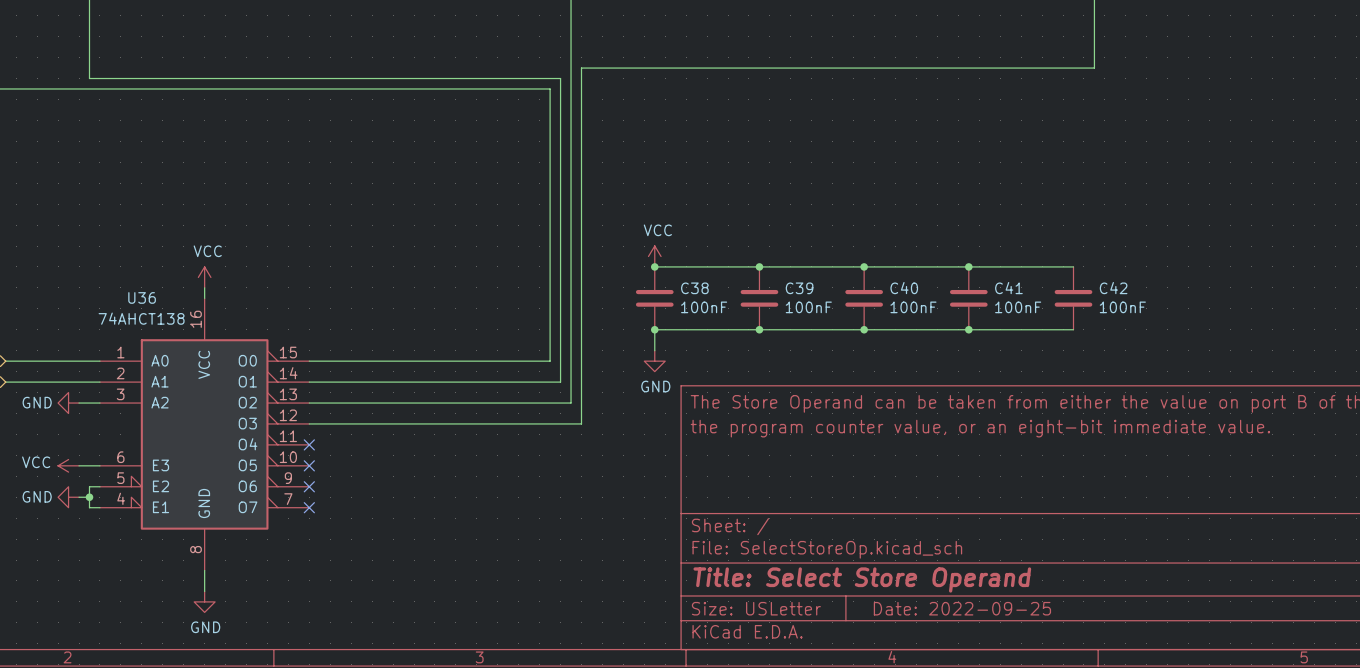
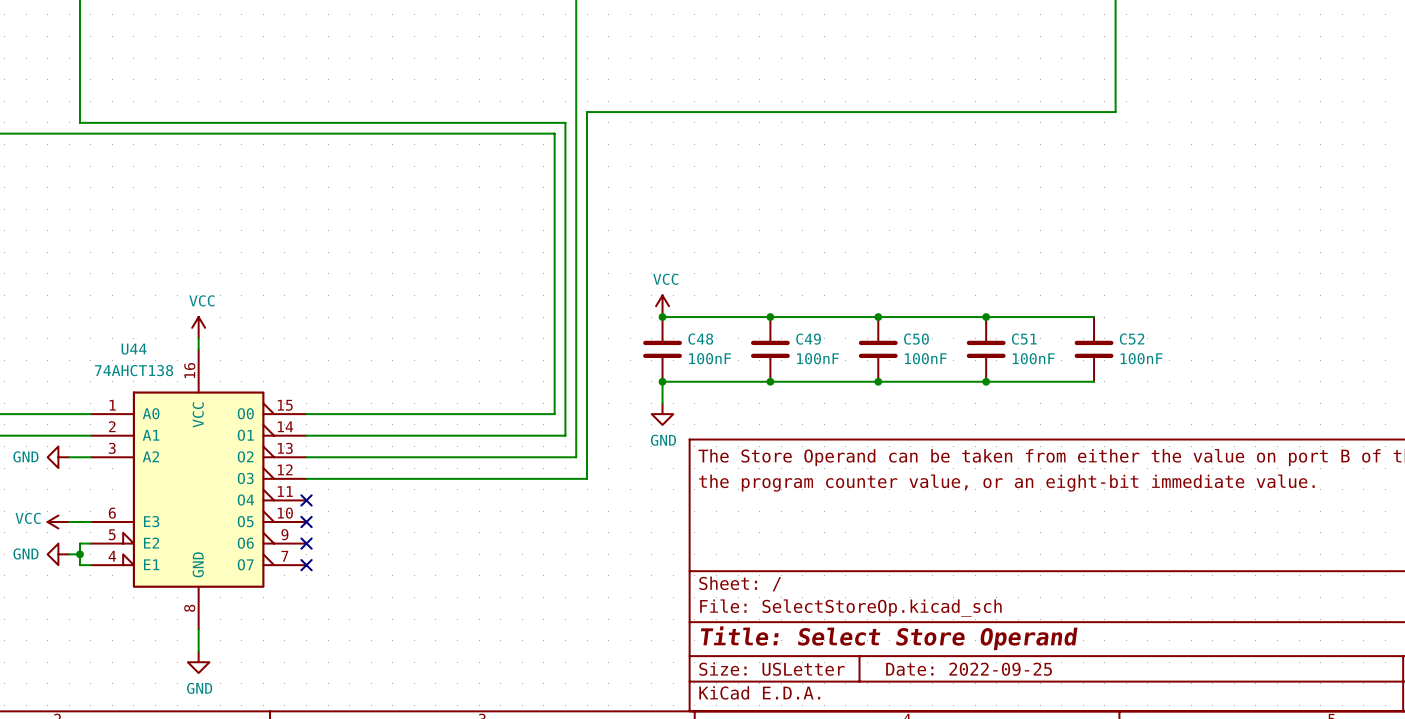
C38 name: C38 (694, 288) -> C48 (700, 339)
C39 name: C39 (799, 288) -> C49 (808, 339)
C40 name: C40 (904, 288) -> C50 (916, 339)
C41 name: C41 (1008, 288) -> C51 (1024, 339)
C42 name: C42 (1113, 288) -> C52 (1132, 339)
U36 name: U36 (142, 297) -> U44 (134, 349)

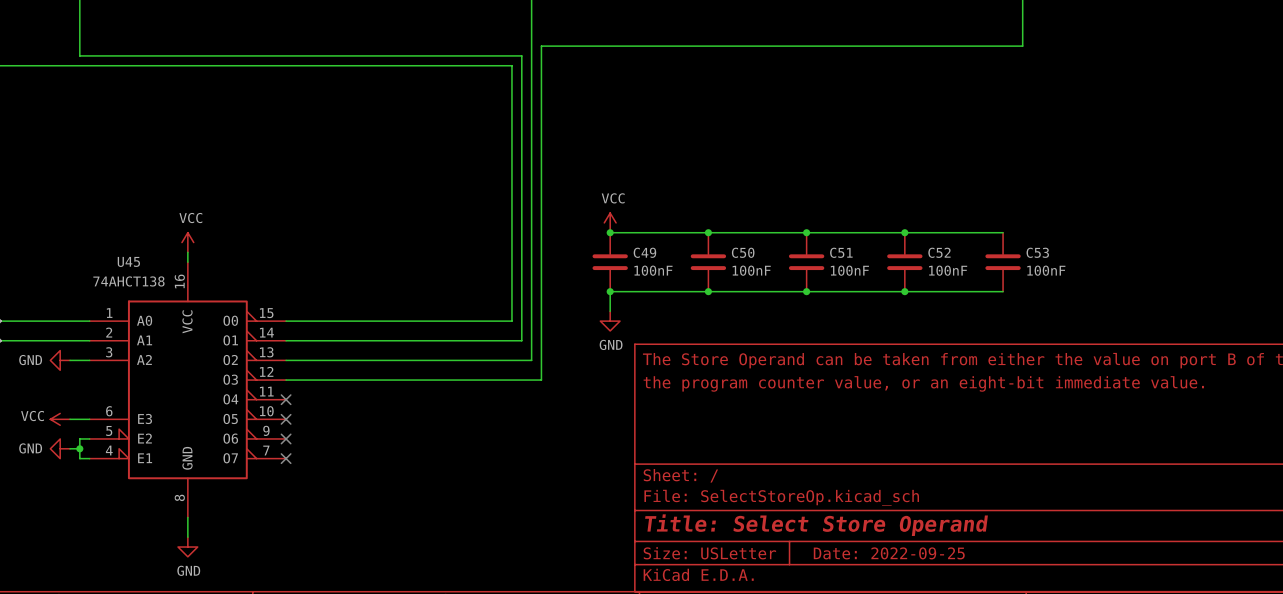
C48 name: C48 (700, 339) -> C49 (644, 252)
C49 name: C49 (808, 339) -> C50 (743, 252)
C50 name: C50 (916, 339) -> C51 (841, 252)
C51 name: C51 (1024, 339) -> C52 (939, 252)
C52 name: C52 (1132, 339) -> C53 (1037, 252)
U44 name: U44 (134, 349) -> U45 (128, 261)

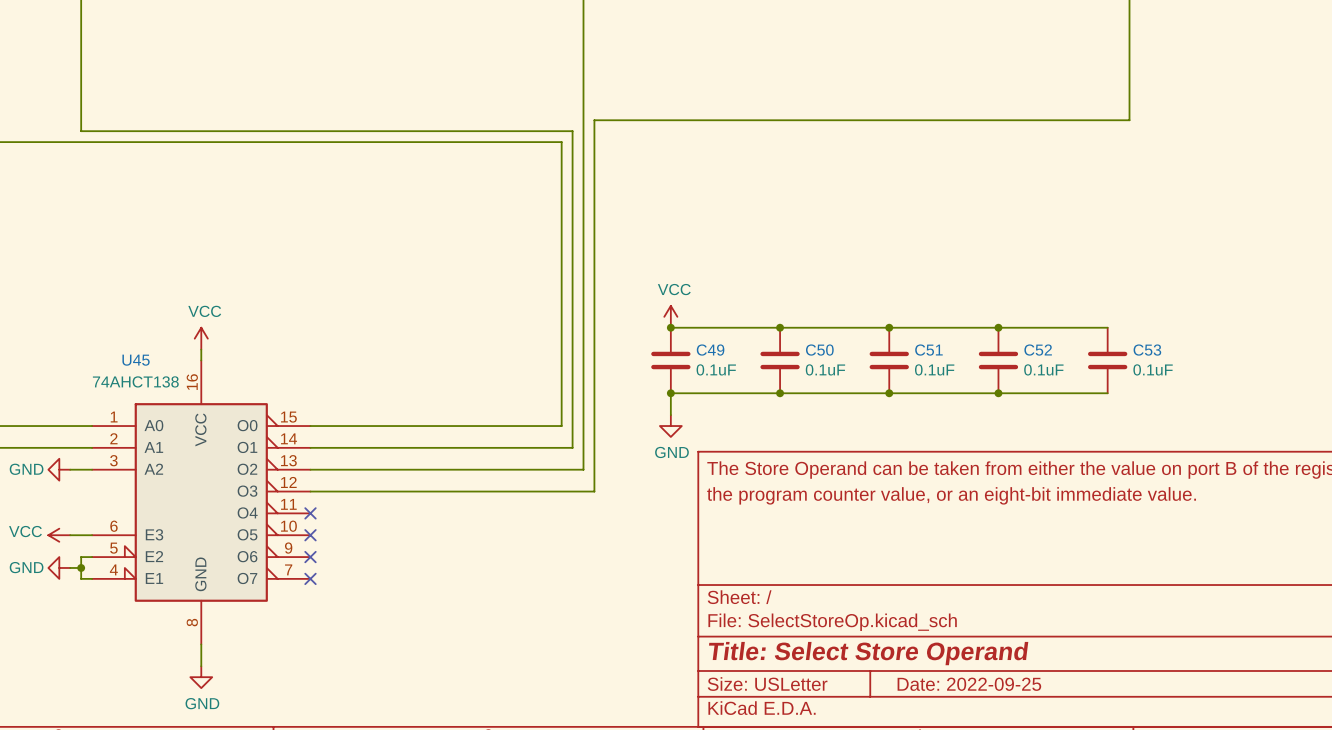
C49 value: 100nF (653, 270) -> 0.1uF (716, 369)
C50 value: 100nF (751, 270) -> 0.1uF (825, 369)
C51 value: 100nF (849, 270) -> 0.1uF (934, 369)
C52 value: 100nF (948, 270) -> 0.1uF (1043, 369)
C53 value: 100nF (1046, 270) -> 0.1uF (1153, 369)

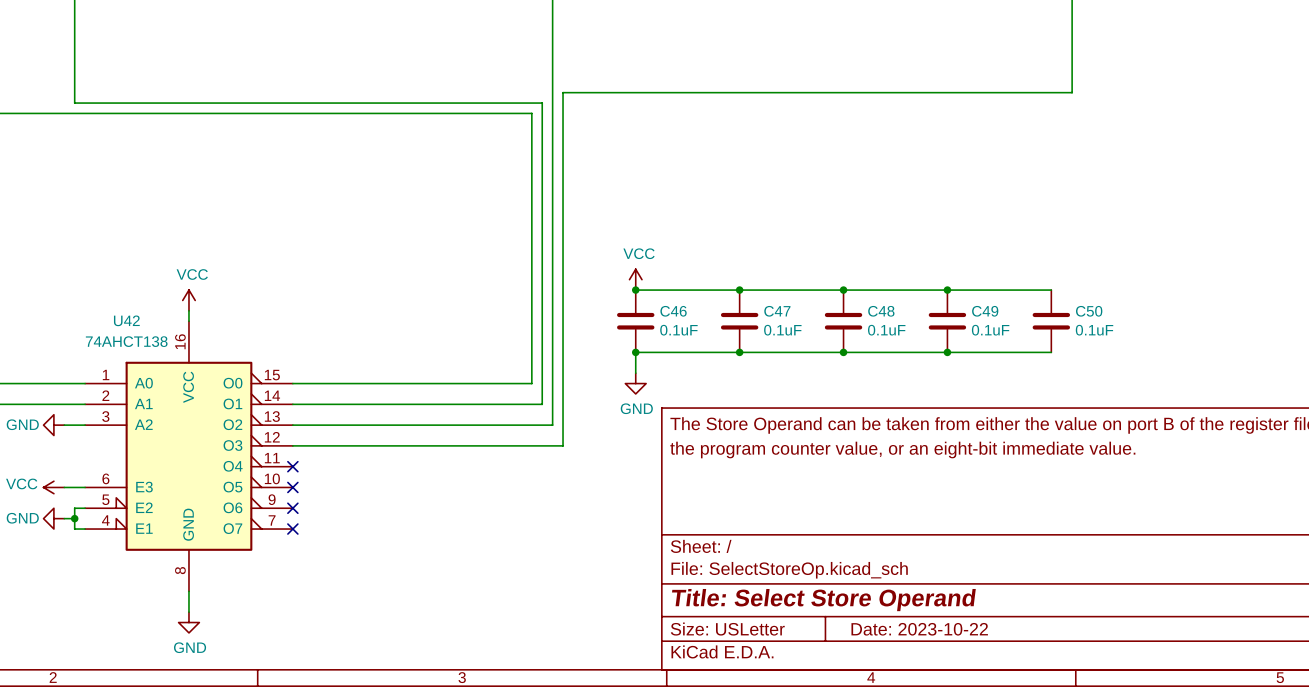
C49 name: C49 (710, 350) -> C46 (673, 311)
C50 name: C50 (819, 350) -> C47 (777, 311)
C51 name: C51 (928, 350) -> C48 (881, 311)
C52 name: C52 (1038, 350) -> C49 (985, 311)
C53 name: C53 (1147, 350) -> C50 (1089, 311)
U45 name: U45 (136, 360) -> U42 (126, 320)
title block: Date: 2022-09-25 (969, 684) -> Date: 2023-10-22 (919, 629)

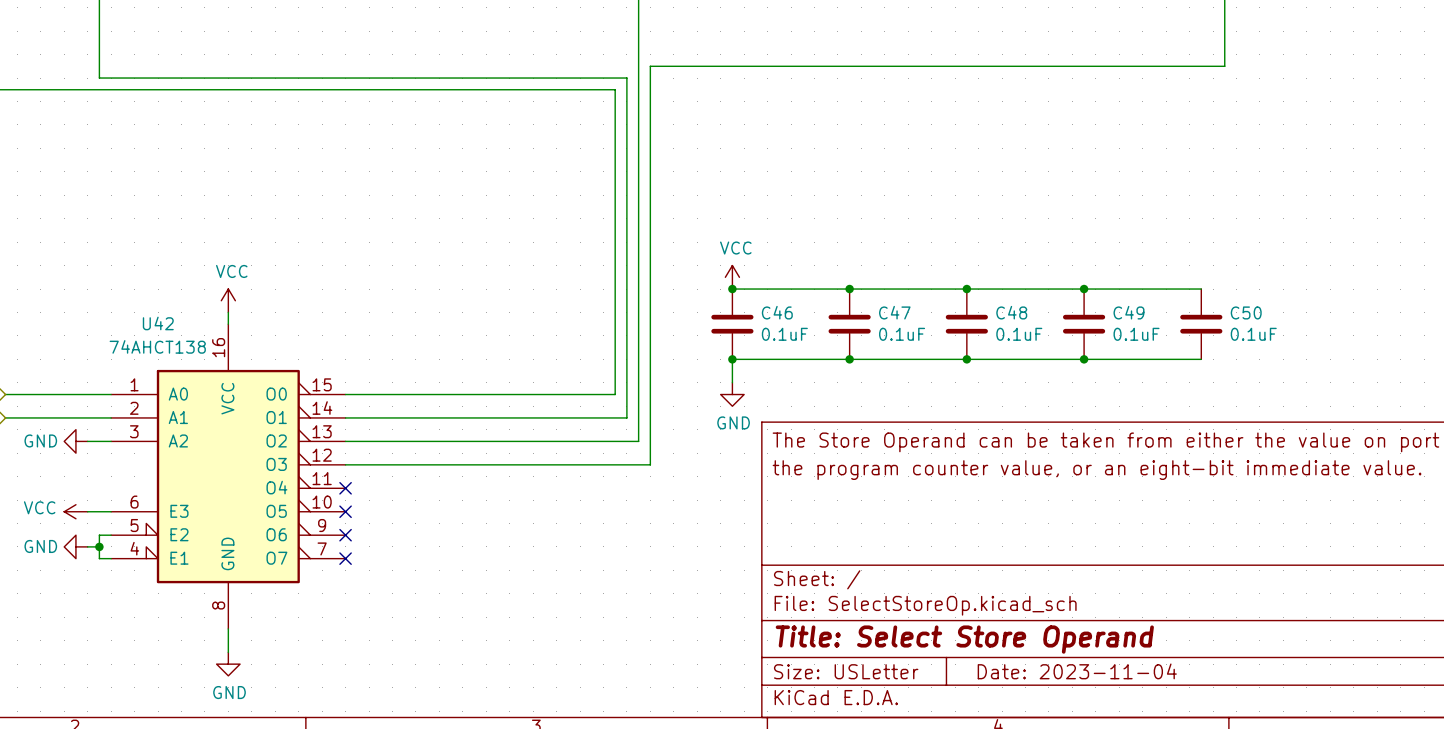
title block: Date: 2023-10-22 (919, 629) -> Date: 2023-11-04 (1077, 671)

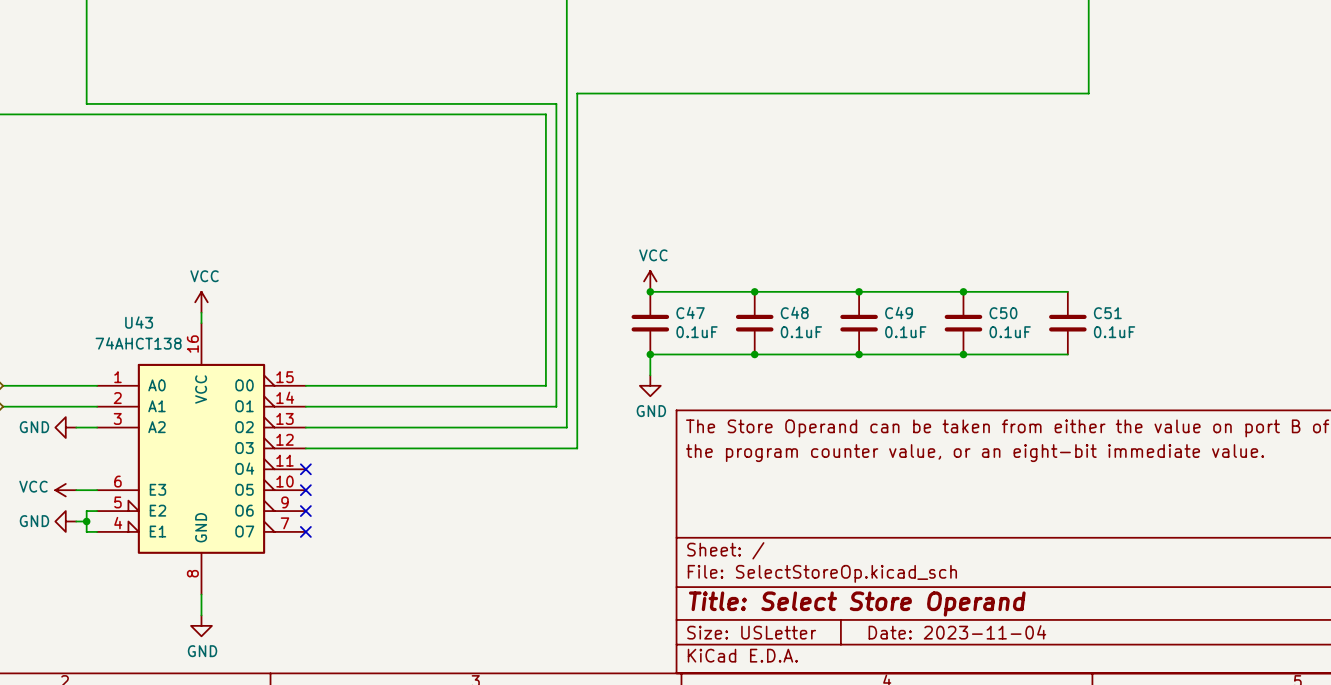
C46 name: C46 (777, 312) -> C47 (690, 312)
C47 name: C47 (894, 312) -> C48 (794, 312)
C48 name: C48 (1011, 312) -> C49 (899, 312)
C49 name: C49 (1128, 312) -> C50 (1003, 313)
C50 name: C50 (1246, 312) -> C51 (1107, 313)
U42 name: U42 (158, 323) -> U43 (139, 322)

